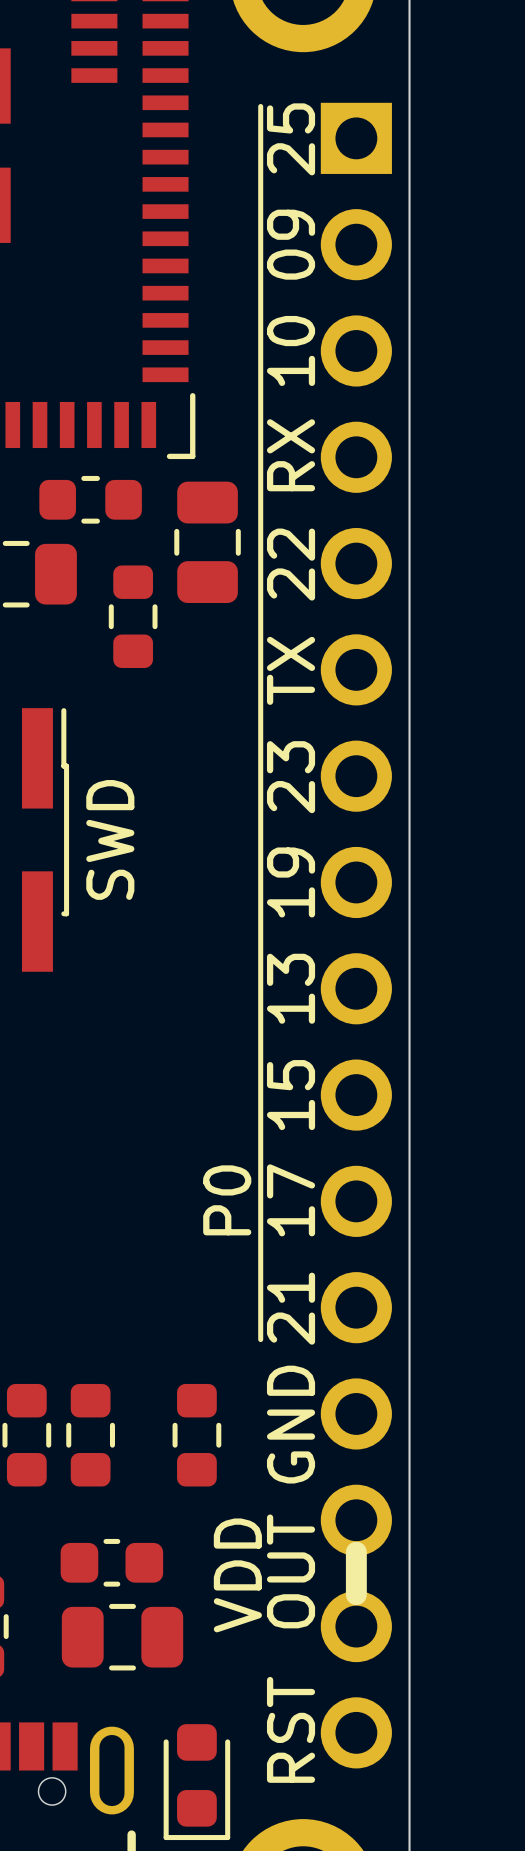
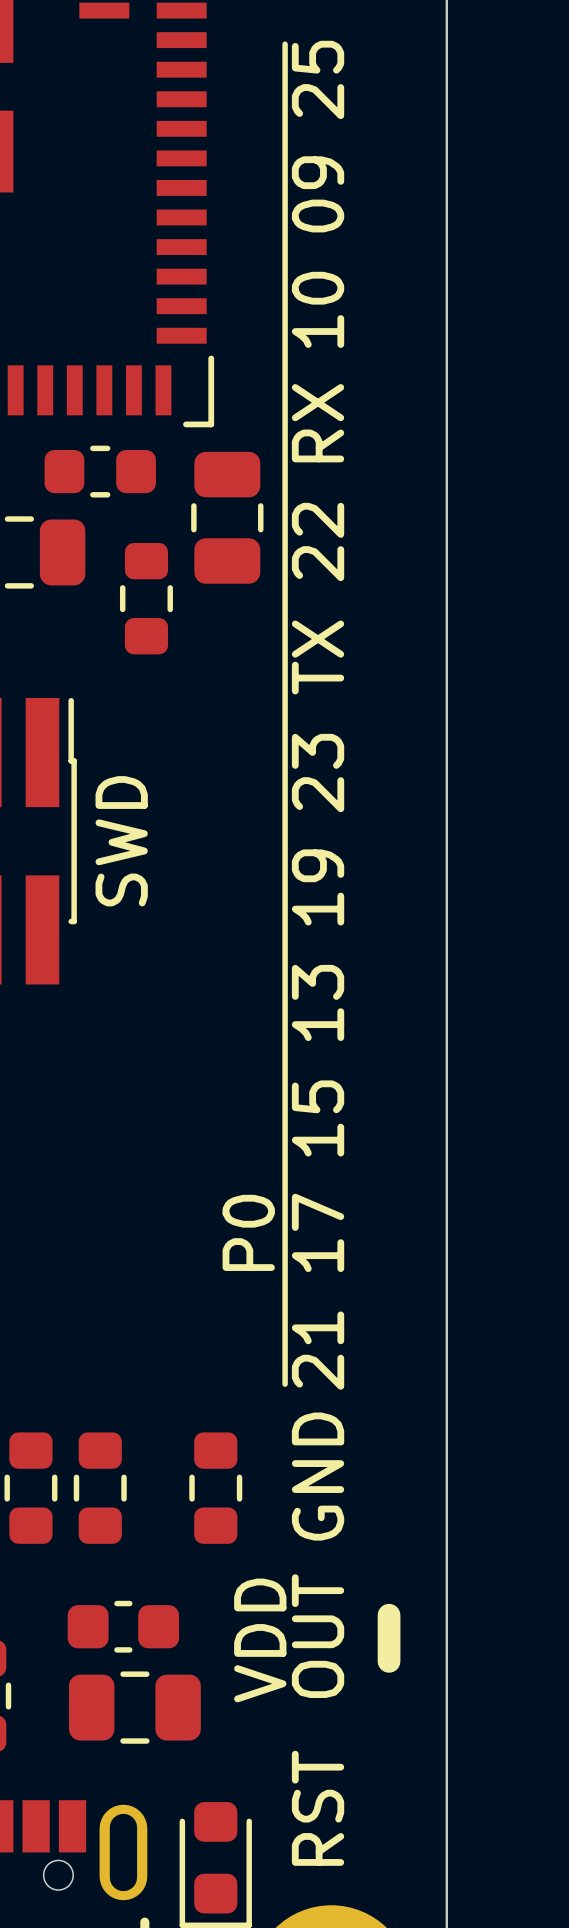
part: (356, 935) -> none

